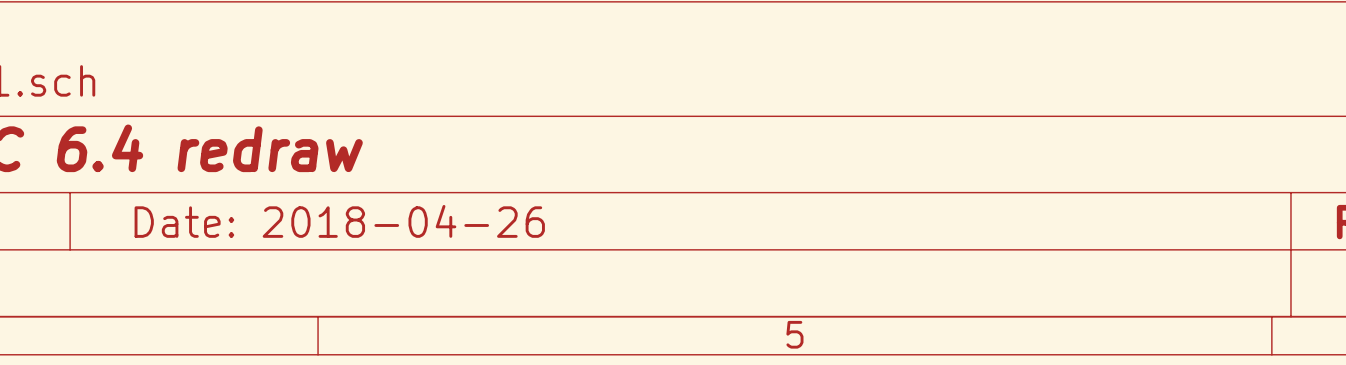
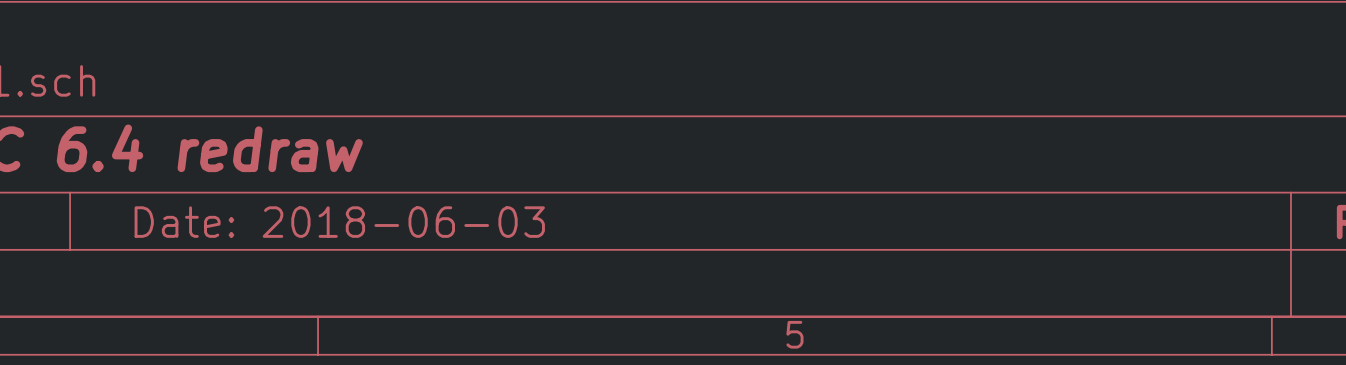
title block: Date: 2018-04-26 (339, 221) -> Date: 2018-06-03 (339, 222)

